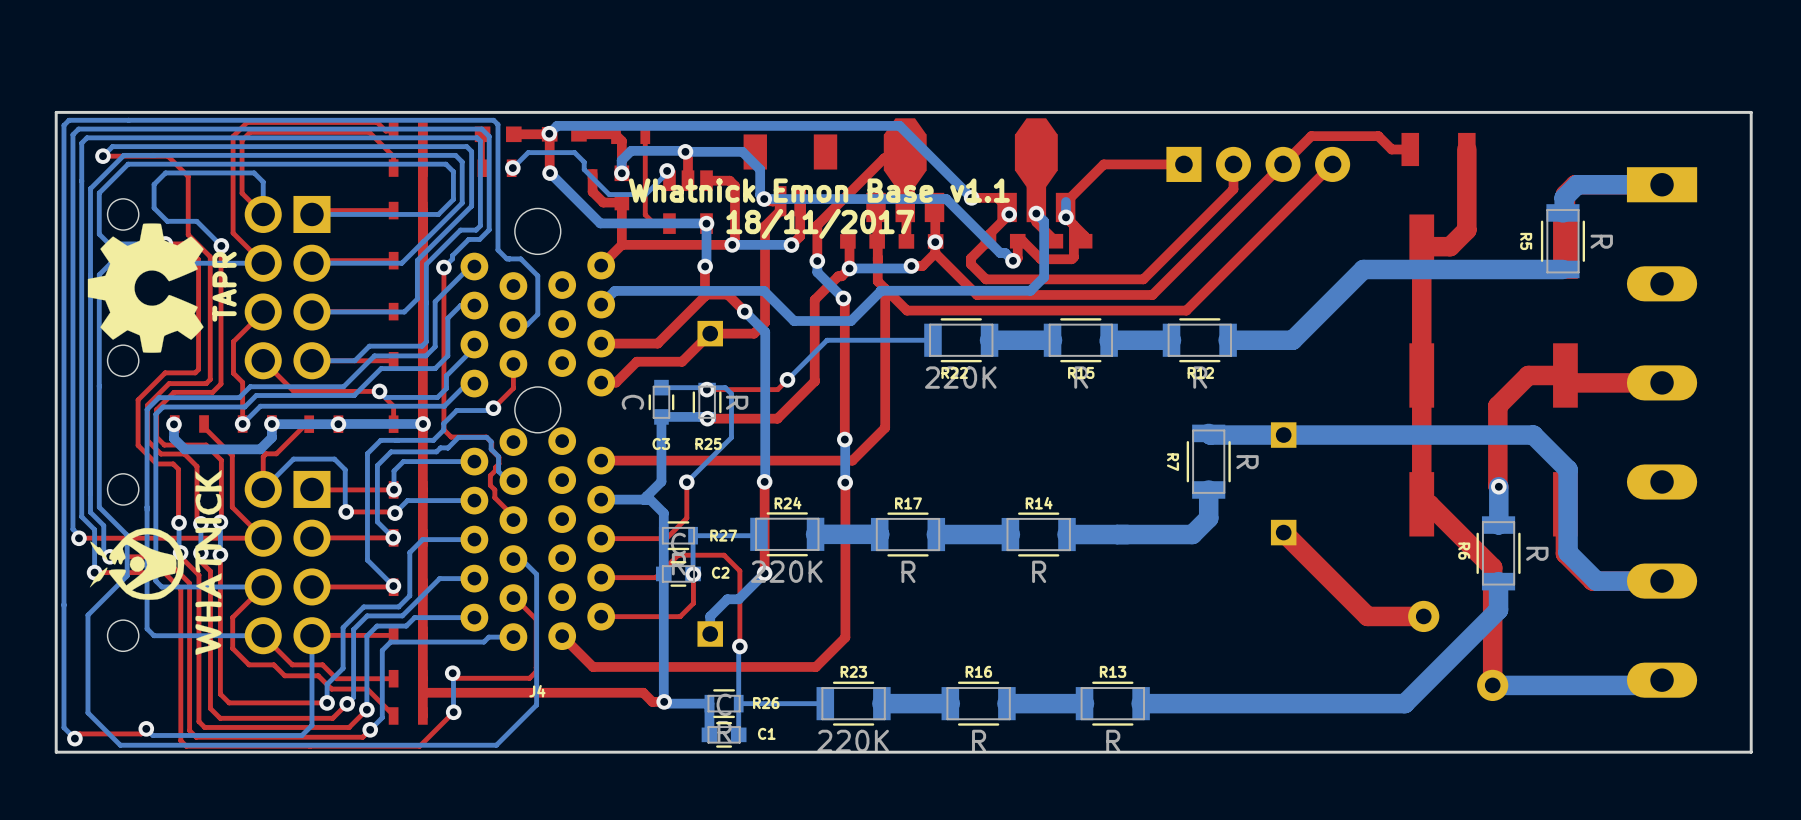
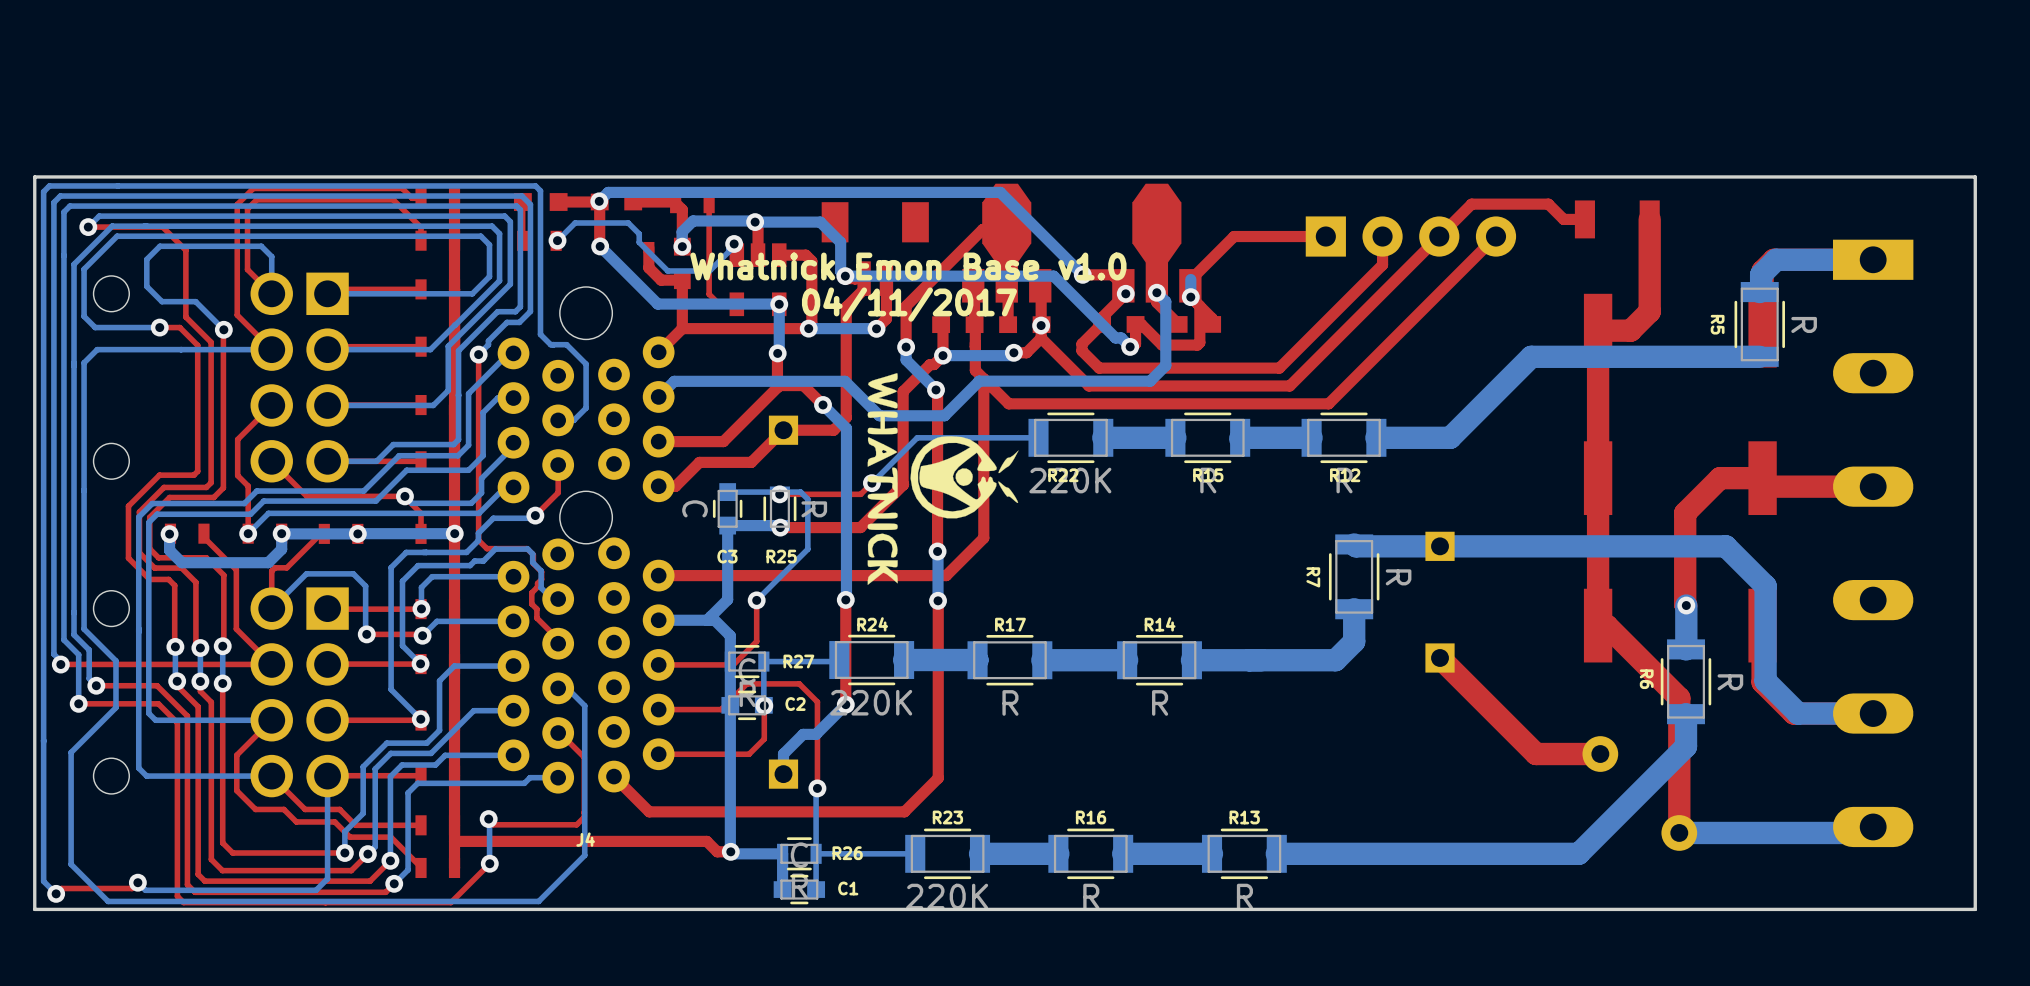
text: Whatnick Emon Base v1.1 (819, 190) -> Whatnick Emon Base v1.0 (908, 266)
drawing: [87, 223, 204, 353] -> none
text: 18/11/2017 (820, 223) -> 04/11/2017 (909, 304)
drawing: none -> [867, 373, 1019, 585]
text: TAPR (224, 286) -> none
drawing: [89, 469, 222, 656] -> none

